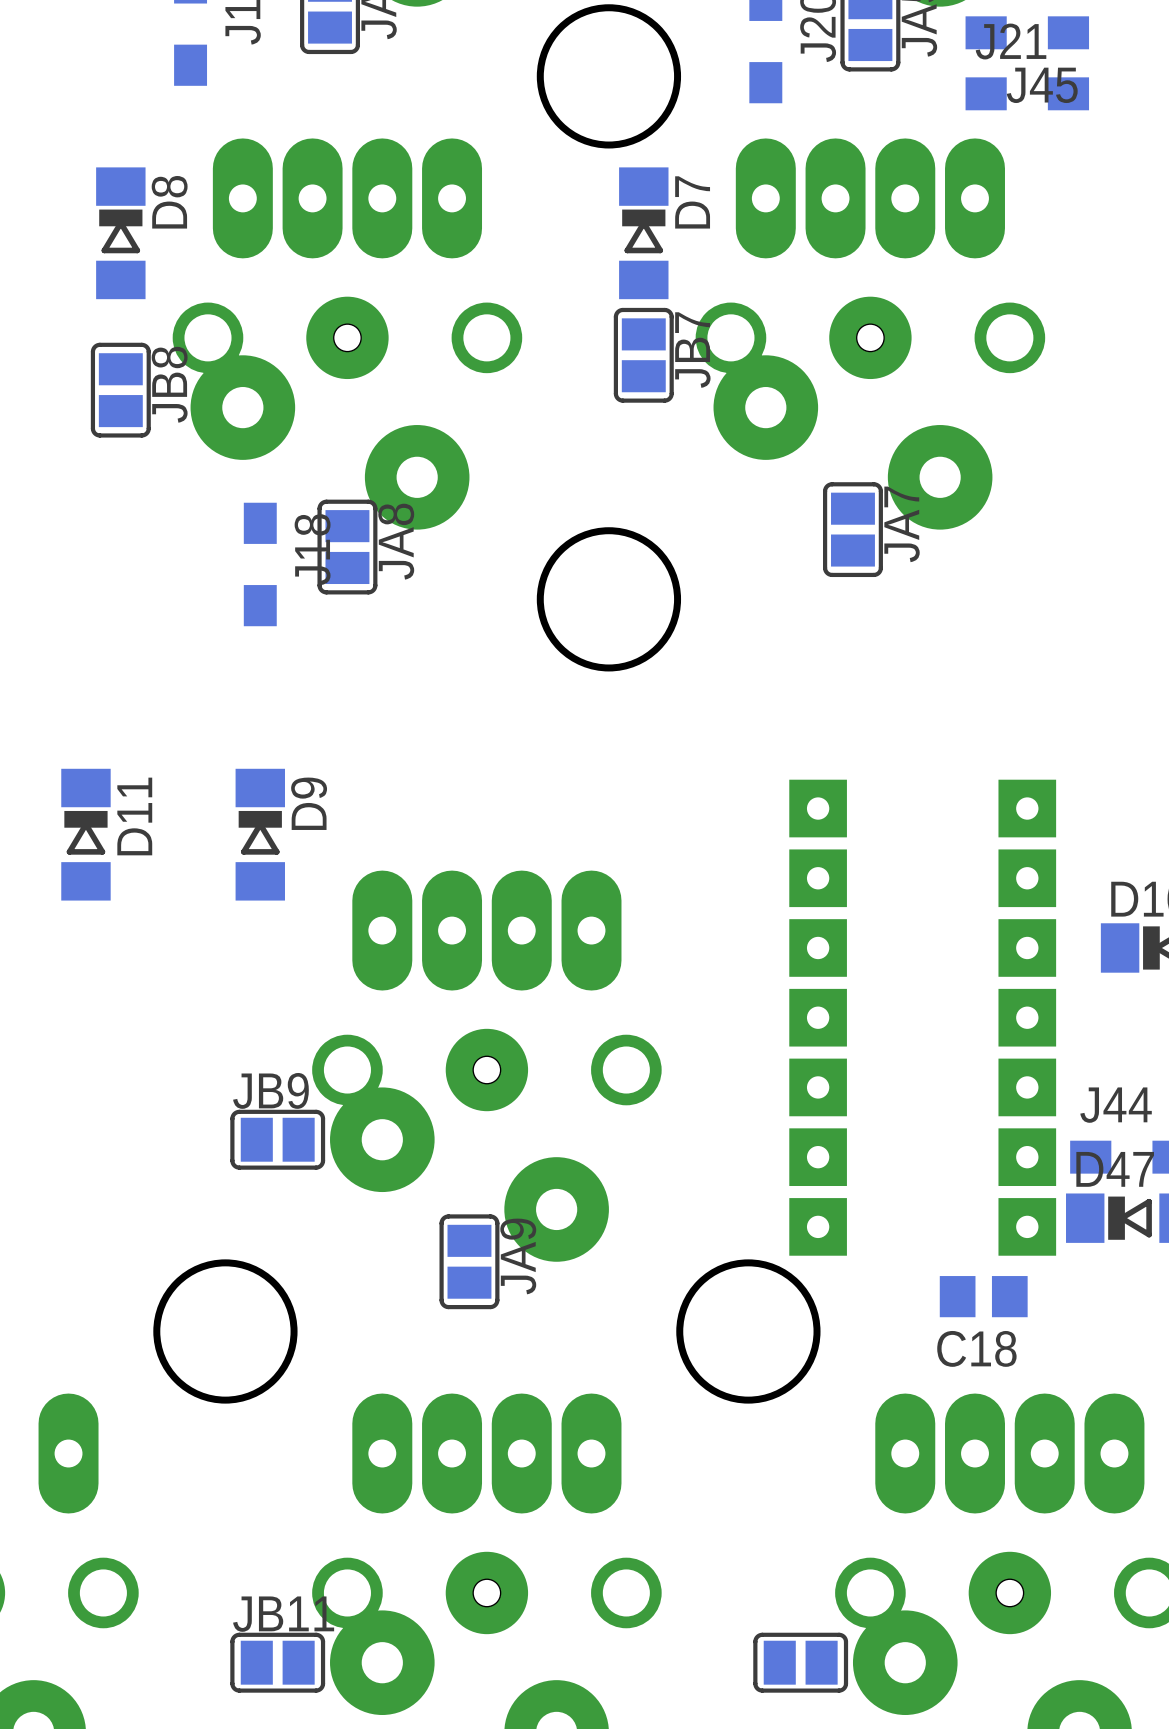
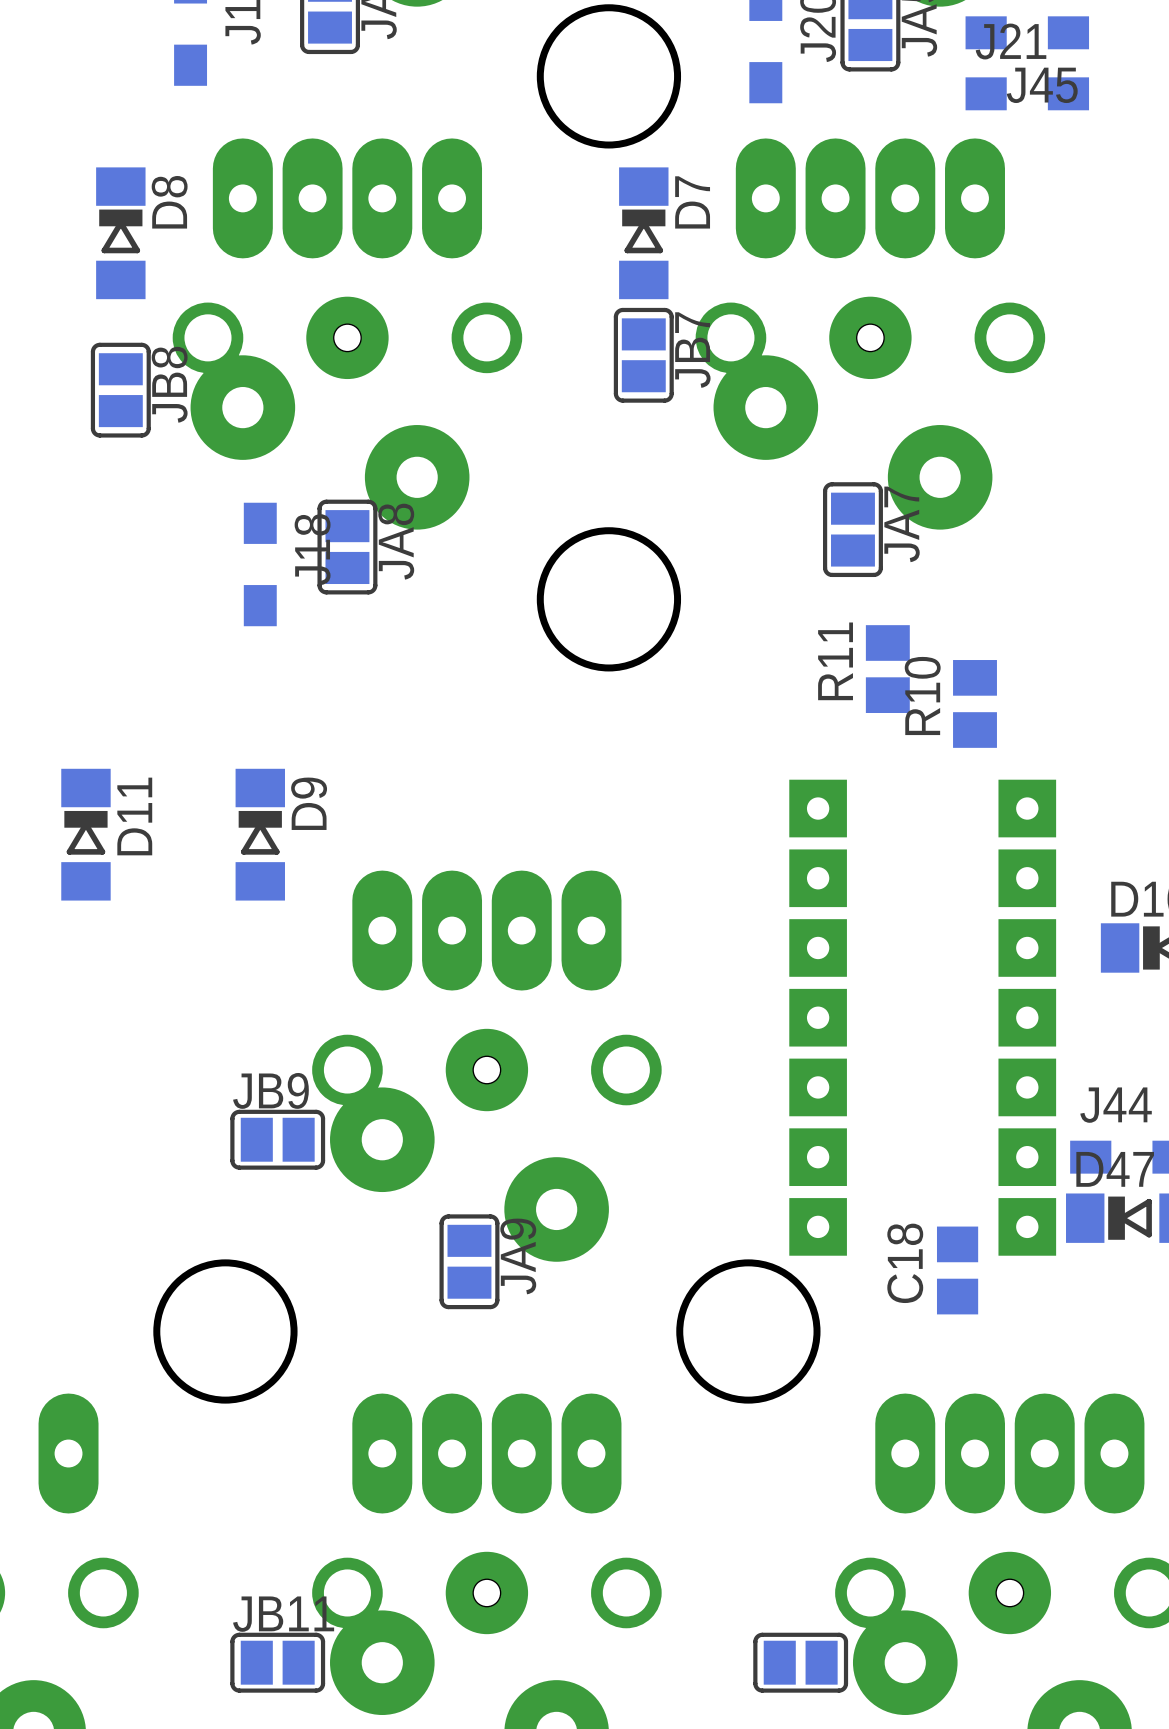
R11: none -> (887, 669)
R10: none -> (975, 703)
C18 rotation: 0° (983, 1296) -> 90° clockwise (957, 1270)

